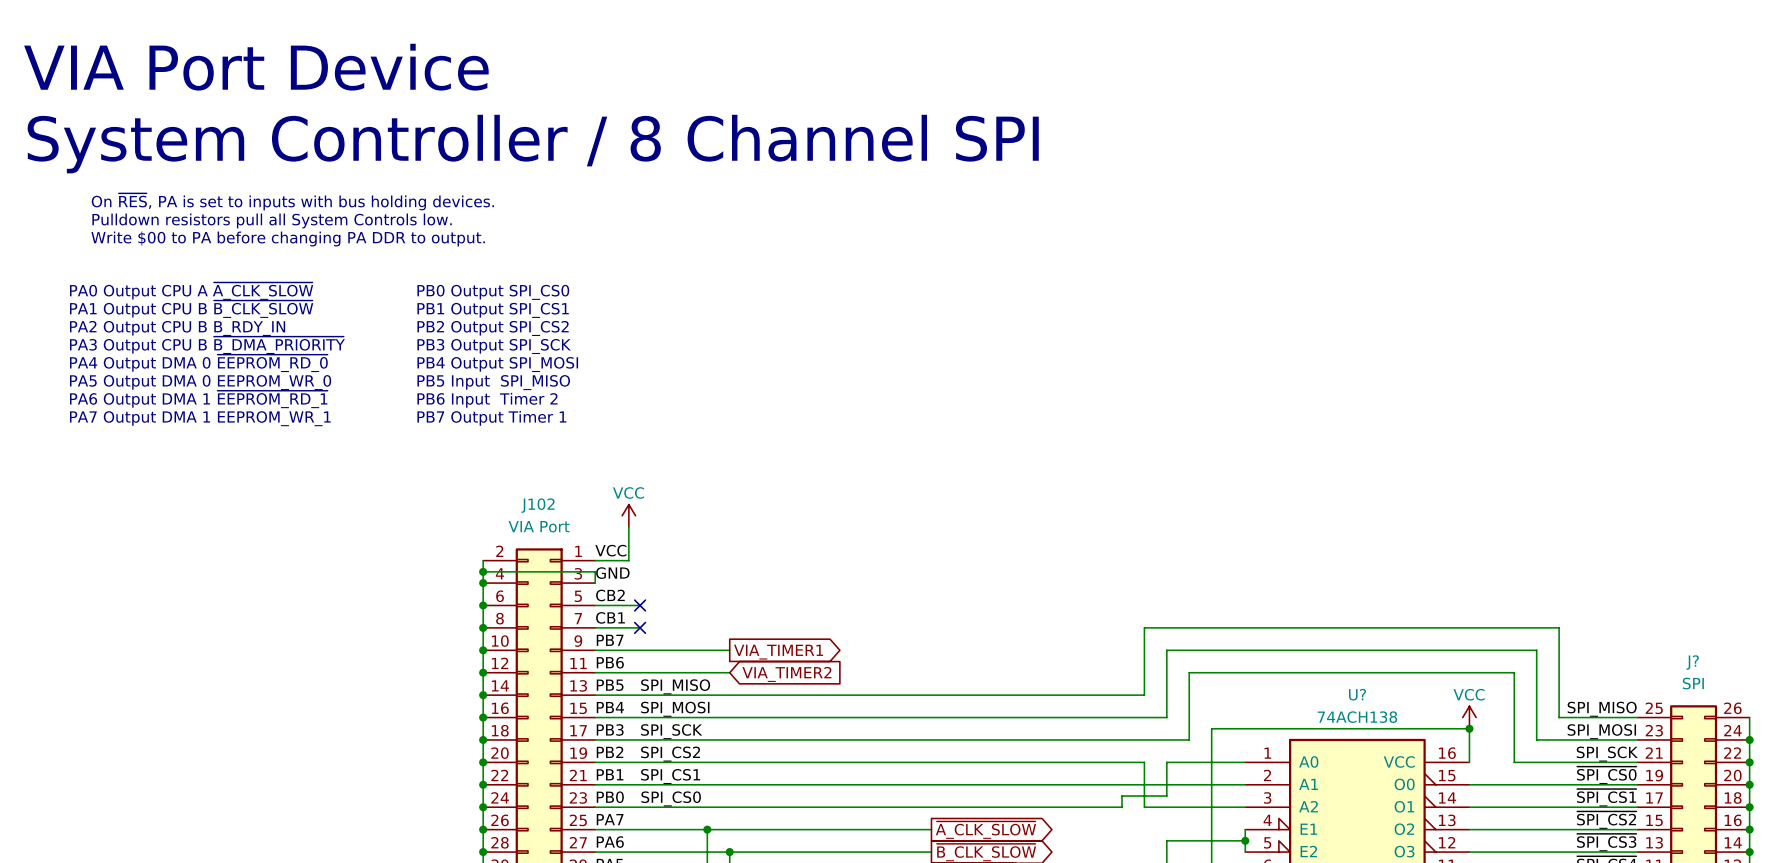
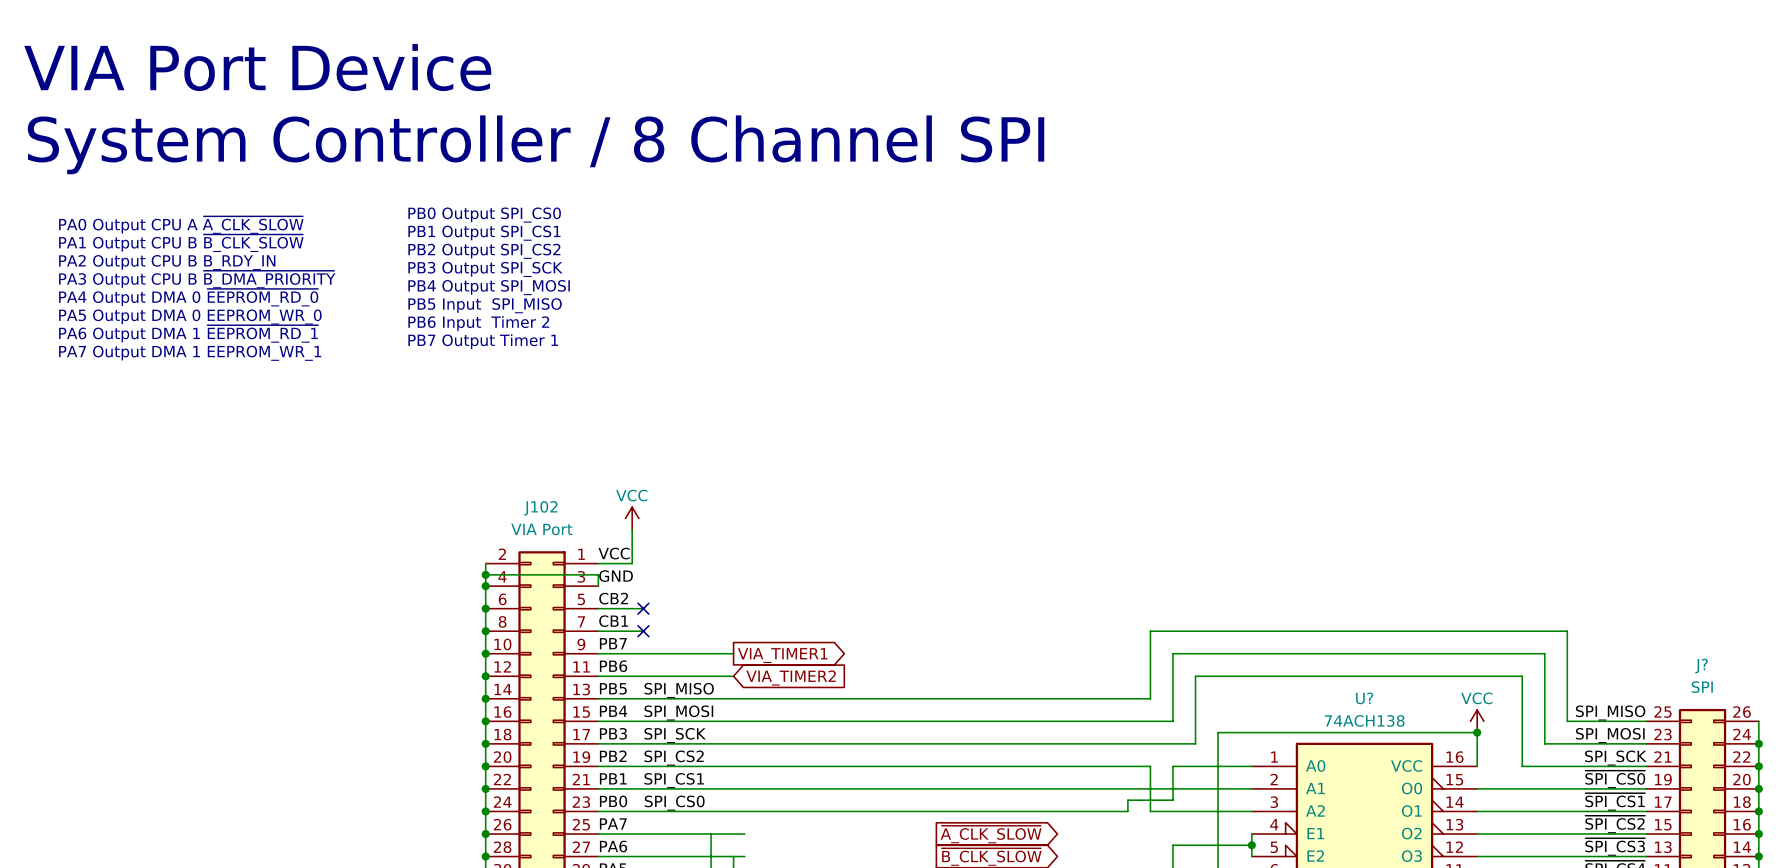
text: On ~{RES}, PA is set to inputs with bus holding devices. (292, 201) -> none
text: Pulldown resistors pull all System Controls low. (272, 220) -> none
text: Write $00 to PA before changing PA DDR to output. (288, 239) -> none
text position: PA0 Output CPU A ~{A_CLK_SLOW} (191, 291) -> PA0 Output CPU A ~{A_CLK_SLOW} (181, 225)
text position: PB0 Output SPI_CS0 (493, 292) -> PB0 Output SPI_CS0 (484, 215)
text position: PA1 Output CPU B ~{B_CLK_SLOW} (191, 309) -> PA1 Output CPU B ~{B_CLK_SLOW} (181, 243)
text position: PB1 Output SPI_CS1 (493, 310) -> PB1 Output SPI_CS1 (484, 233)
text position: PA2 Output CPU B B_RDY_IN (177, 328) -> PA2 Output CPU B B_RDY_IN (167, 262)
text position: PB2 Output SPI_CS2 (493, 328) -> PB2 Output SPI_CS2 (484, 251)
text position: PA3 Output CPU B ~{B_DMA_PRIORITY} (207, 345) -> PA3 Output CPU B ~{B_DMA_PRIORITY} (197, 279)
text position: PB3 Output SPI_SCK (494, 346) -> PB3 Output SPI_SCK (485, 269)
text position: PA4 Output DMA 0 ~{EEPROM_RD_0} (198, 363) -> PA4 Output DMA 0 ~{EEPROM_RD_0} (188, 297)
text position: PB4 Output SPI_MOSI (497, 364) -> PB4 Output SPI_MOSI (489, 287)
text position: PA5 Output DMA 0 EEPROM_WR_0 (200, 382) -> PA5 Output DMA 0 EEPROM_WR_0 (190, 317)
text position: PB5 Input SPI_MISO (493, 382) -> PB5 Input SPI_MISO (485, 305)
text position: PA6 Output DMA 1 ~{EEPROM_RD_1} (198, 399) -> PA6 Output DMA 1 ~{EEPROM_RD_1} (188, 333)
text position: PB6 Input Timer 2 (487, 400) -> PB6 Input Timer 2 (478, 323)
text position: PA7 Output DMA 1 EEPROM_WR_1 (200, 418) -> PA7 Output DMA 1 EEPROM_WR_1 (190, 353)
text position: PB7 Output Timer 1 (491, 418) -> PB7 Output Timer 1 (483, 341)
junction: (707, 829) -> none
wire: (740, 829) (931, 829) -> none
junction: (729, 852) -> none
wire: (740, 852) (931, 852) -> none

